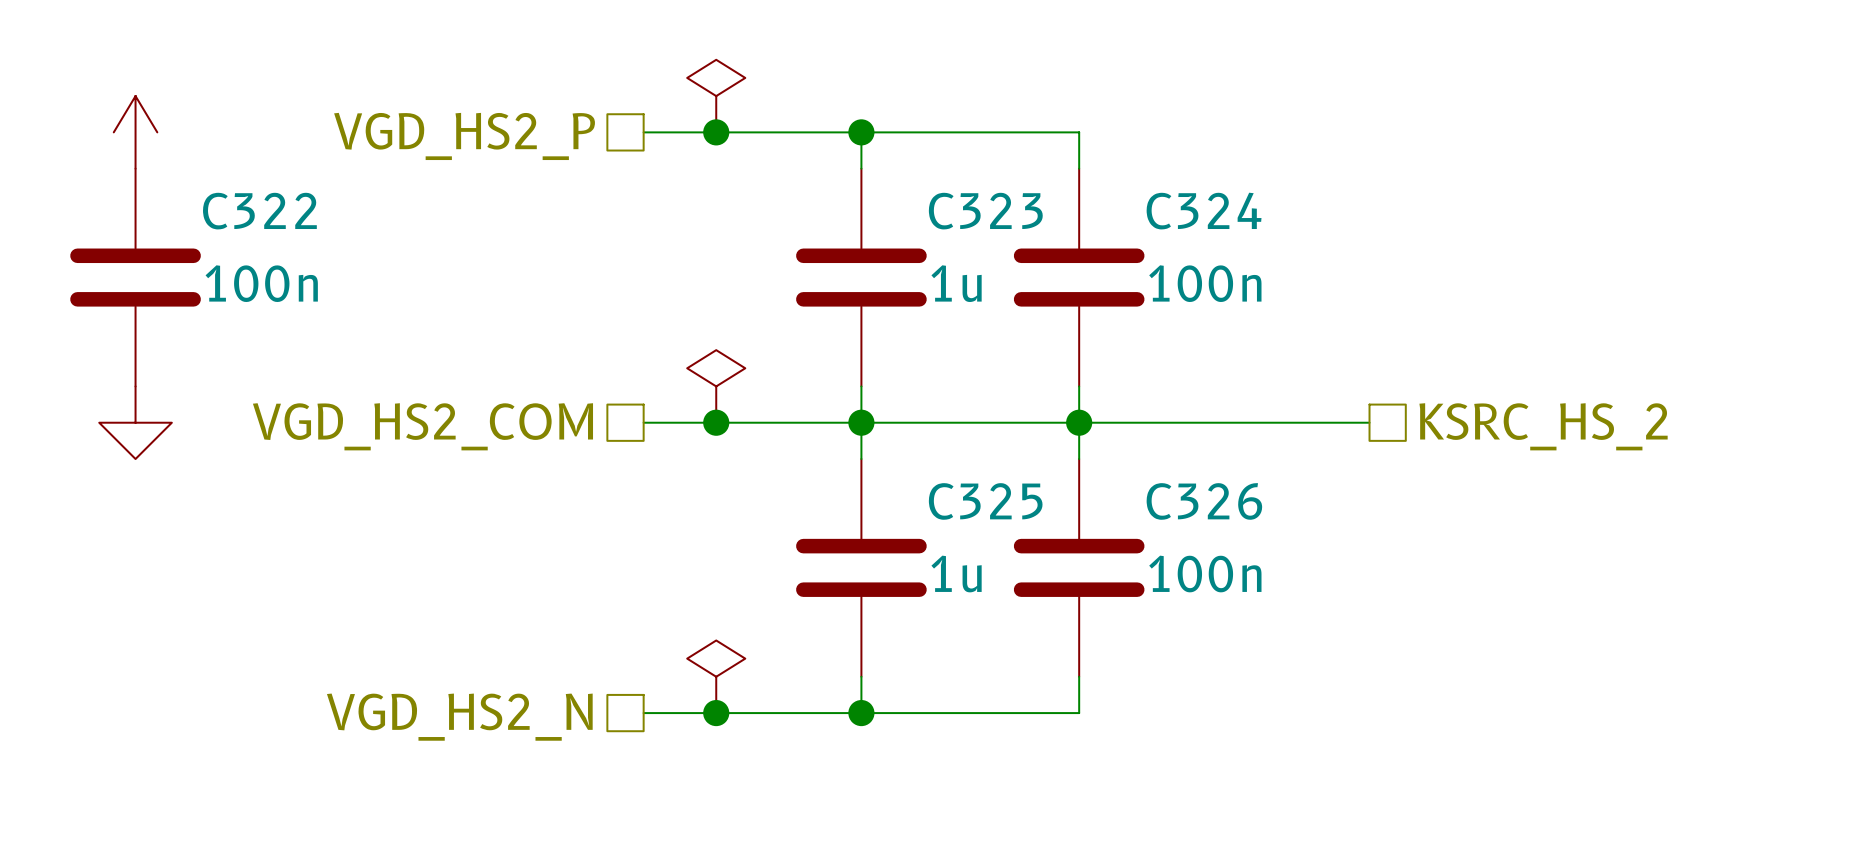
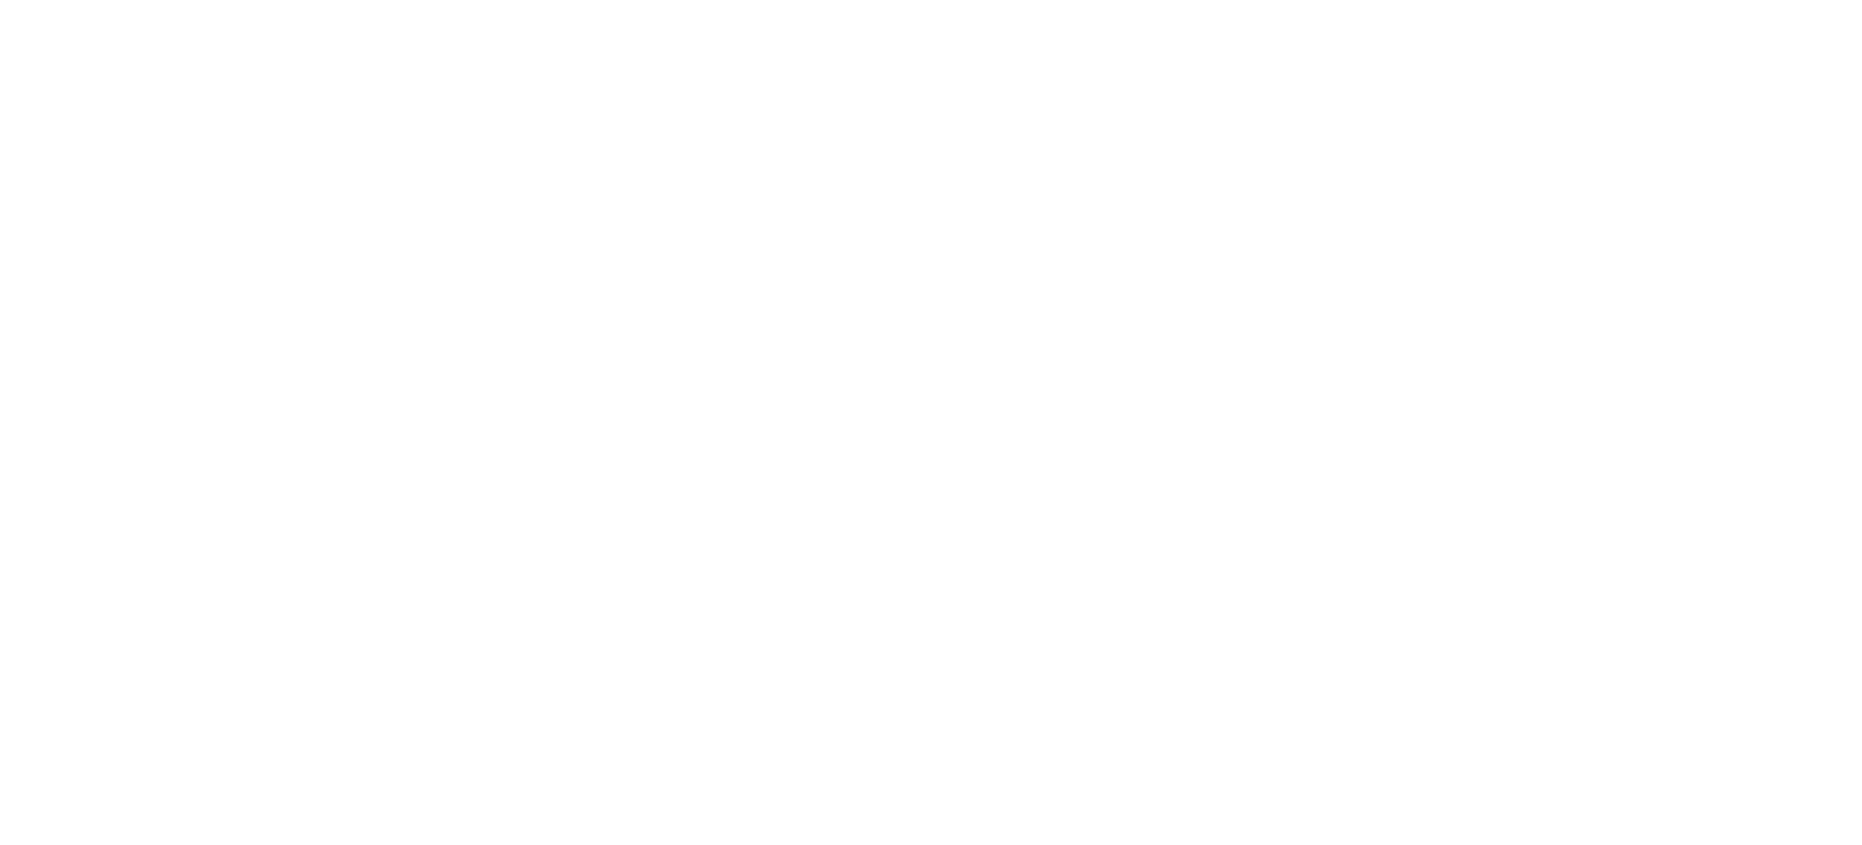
power symbol: (716, 96) -> none
power symbol: (135, 132) -> none
wire: (643, 132) (1079, 132) (1079, 168) -> none
junction: (716, 132) -> none
wire: (861, 132) (861, 168) -> none
junction: (861, 132) -> none
hierarchical label: VGD_HS2_P (464, 136) -> none
C322: 100n (135, 277) -> none
C323: 1u (861, 277) -> none
C324: 100n (1079, 277) -> none
power symbol: (716, 386) -> none
wire: (861, 386) (861, 459) -> none
wire: (1079, 386) (1079, 459) -> none
power symbol: (135, 422) -> none
wire: (643, 422) (1369, 422) -> none
junction: (716, 422) -> none
junction: (861, 422) -> none
junction: (1079, 422) -> none
hierarchical label: VGD_HS2_COM (422, 426) -> none
hierarchical label: KSRC_HS_2 (1543, 426) -> none
C325: 1u (861, 567) -> none
C326: 100n (1079, 567) -> none
power symbol: (716, 676) -> none
wire: (861, 676) (861, 713) -> none
wire: (1079, 676) (1079, 713) (643, 713) -> none
junction: (716, 713) -> none
junction: (861, 713) -> none
hierarchical label: VGD_HS2_N (459, 717) -> none

